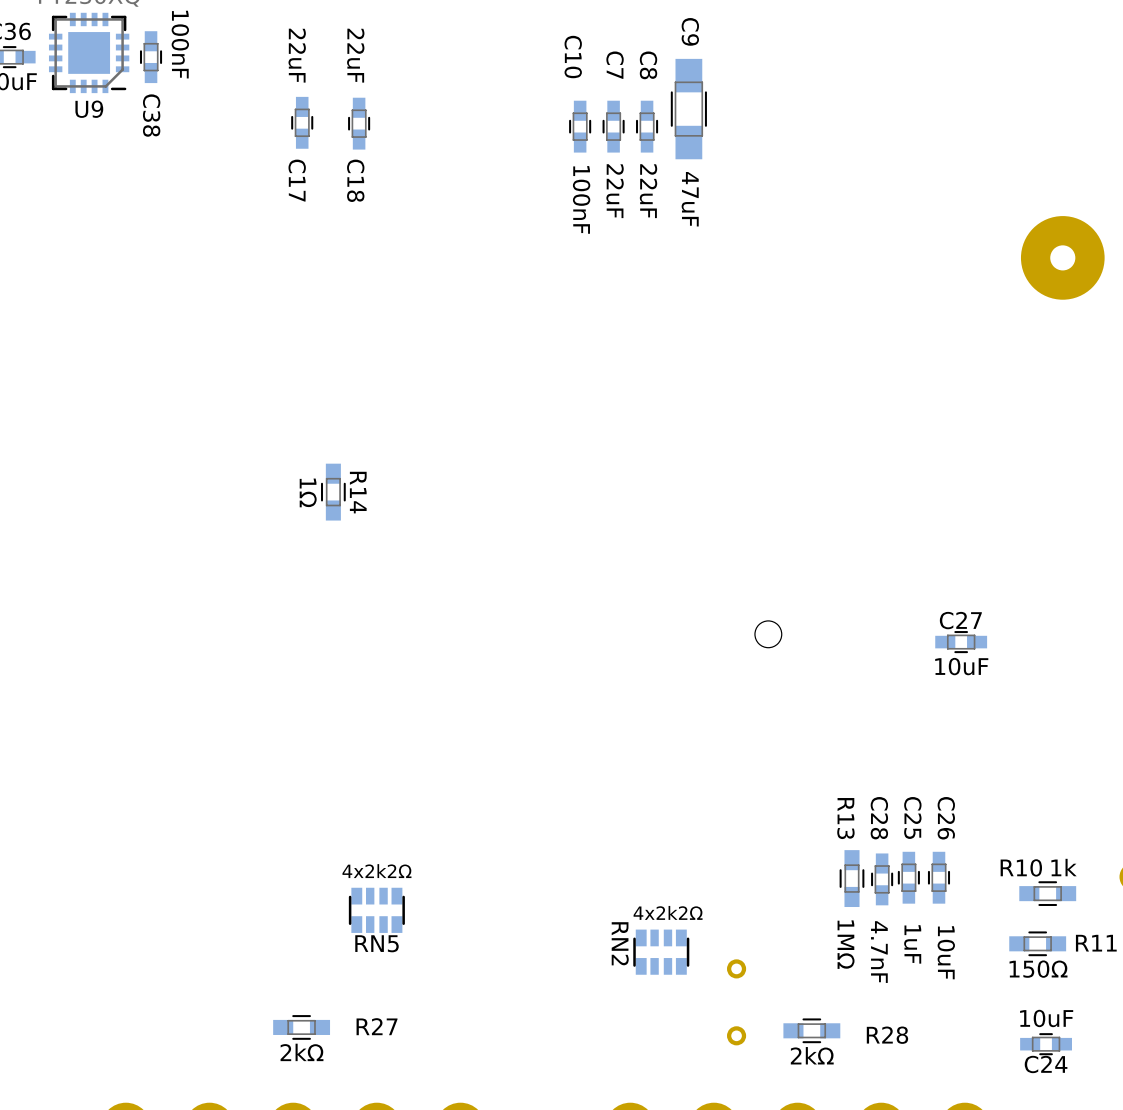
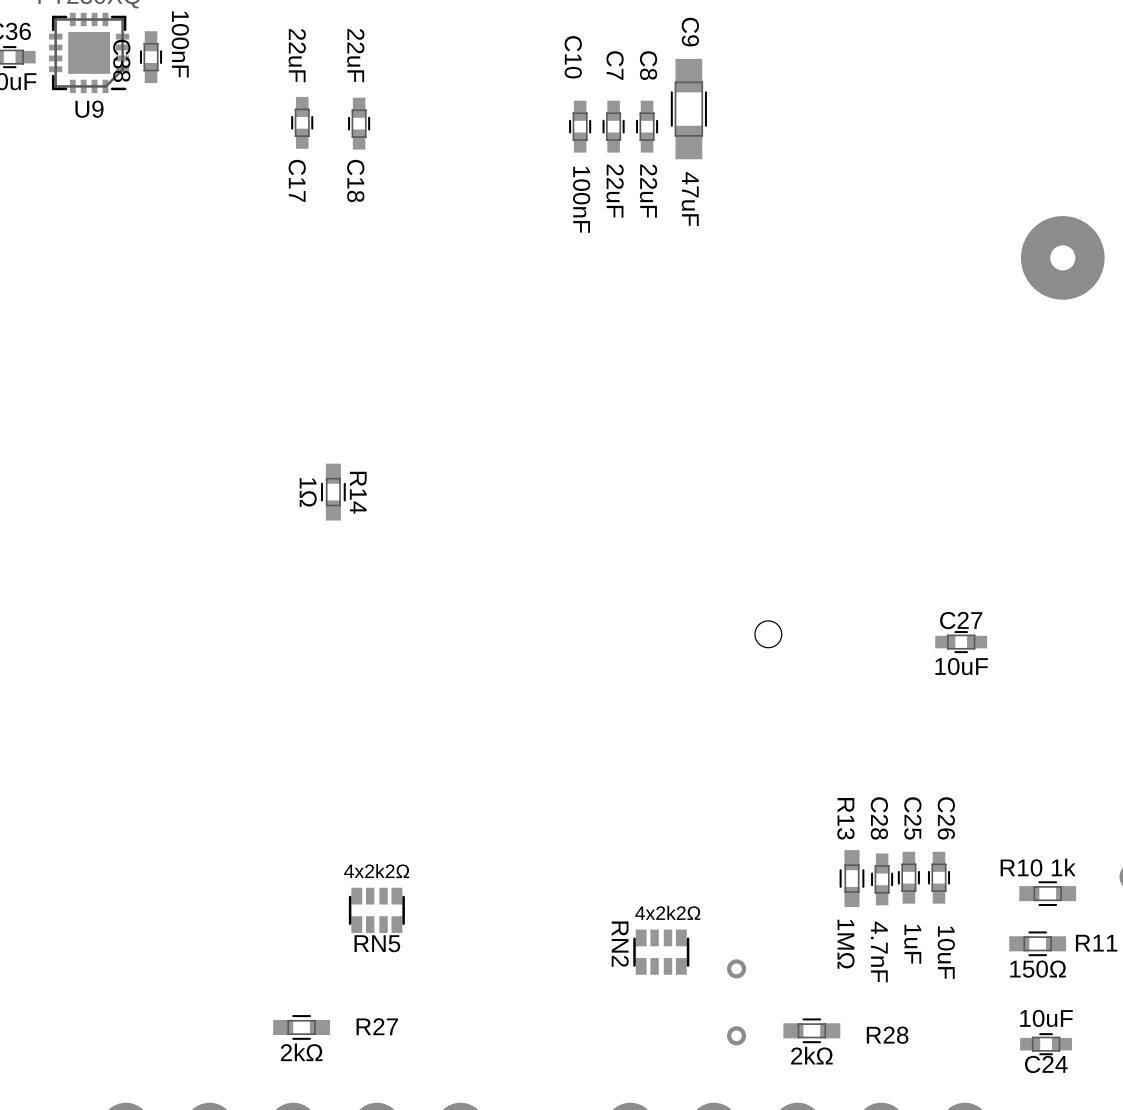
C38 name position: C38 (151, 115) -> C38 (121, 60)

